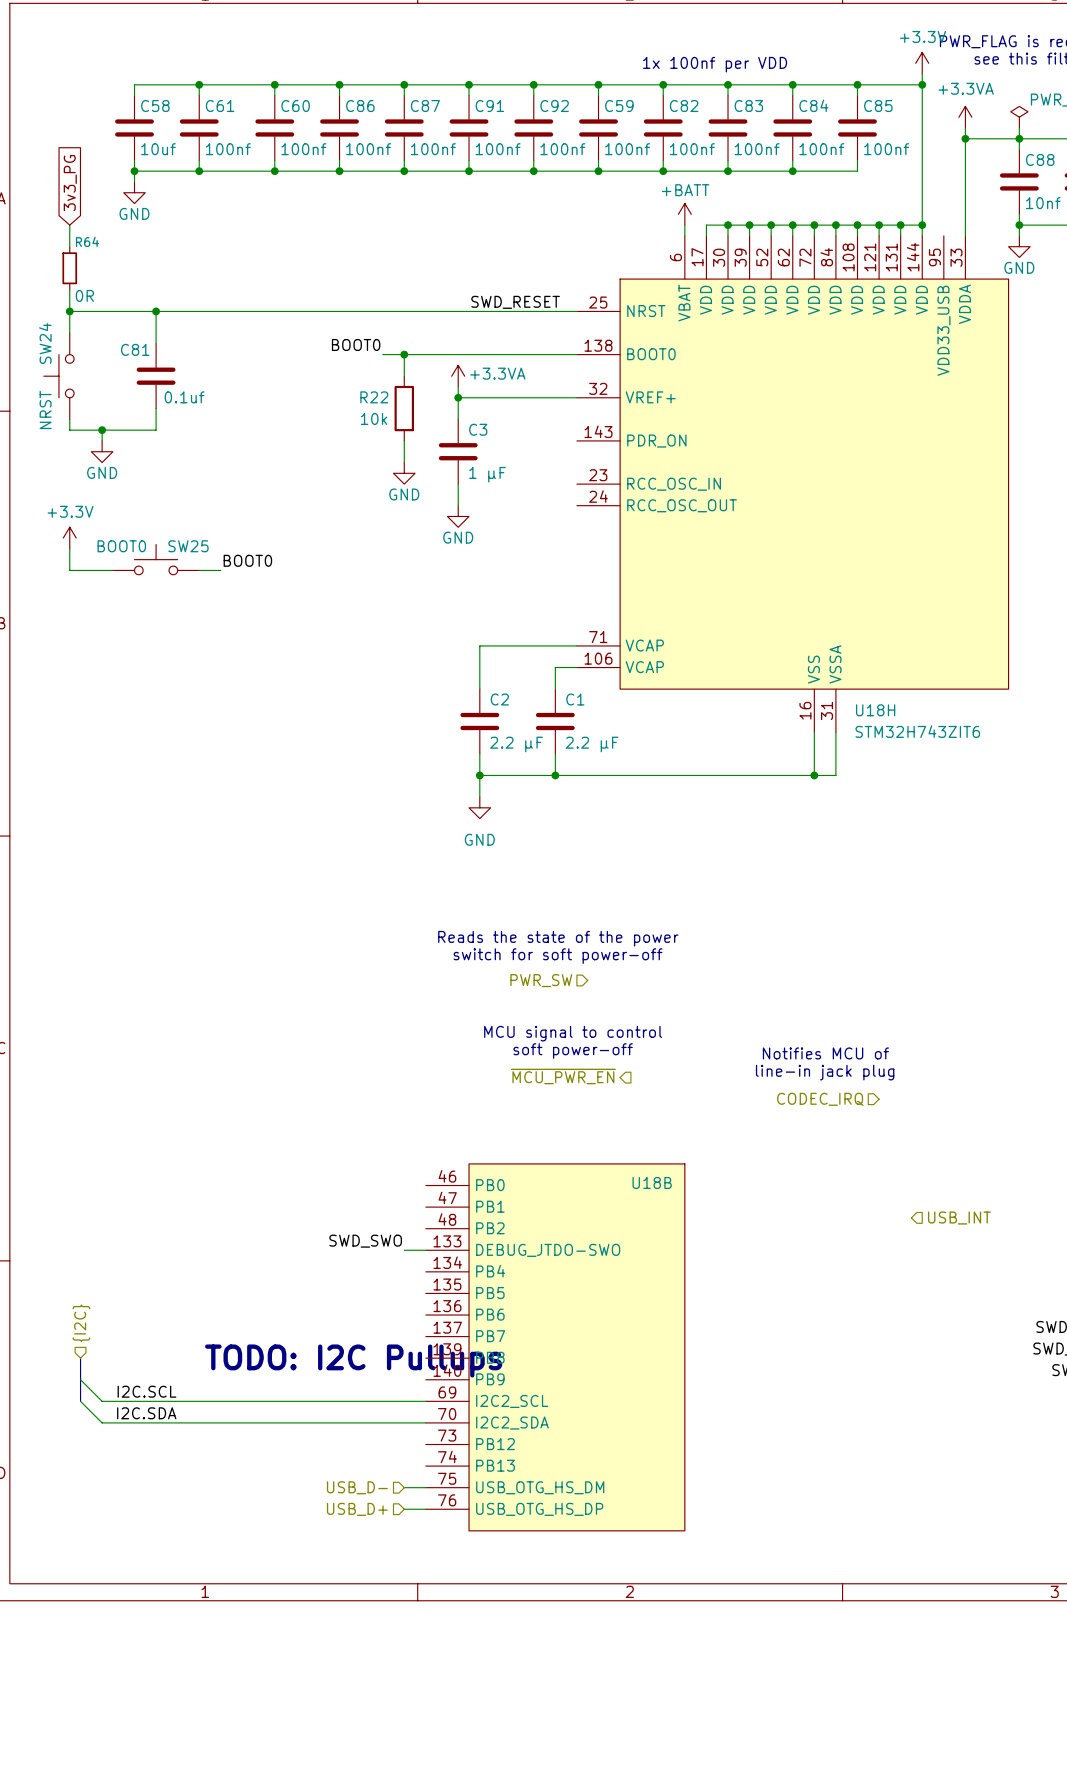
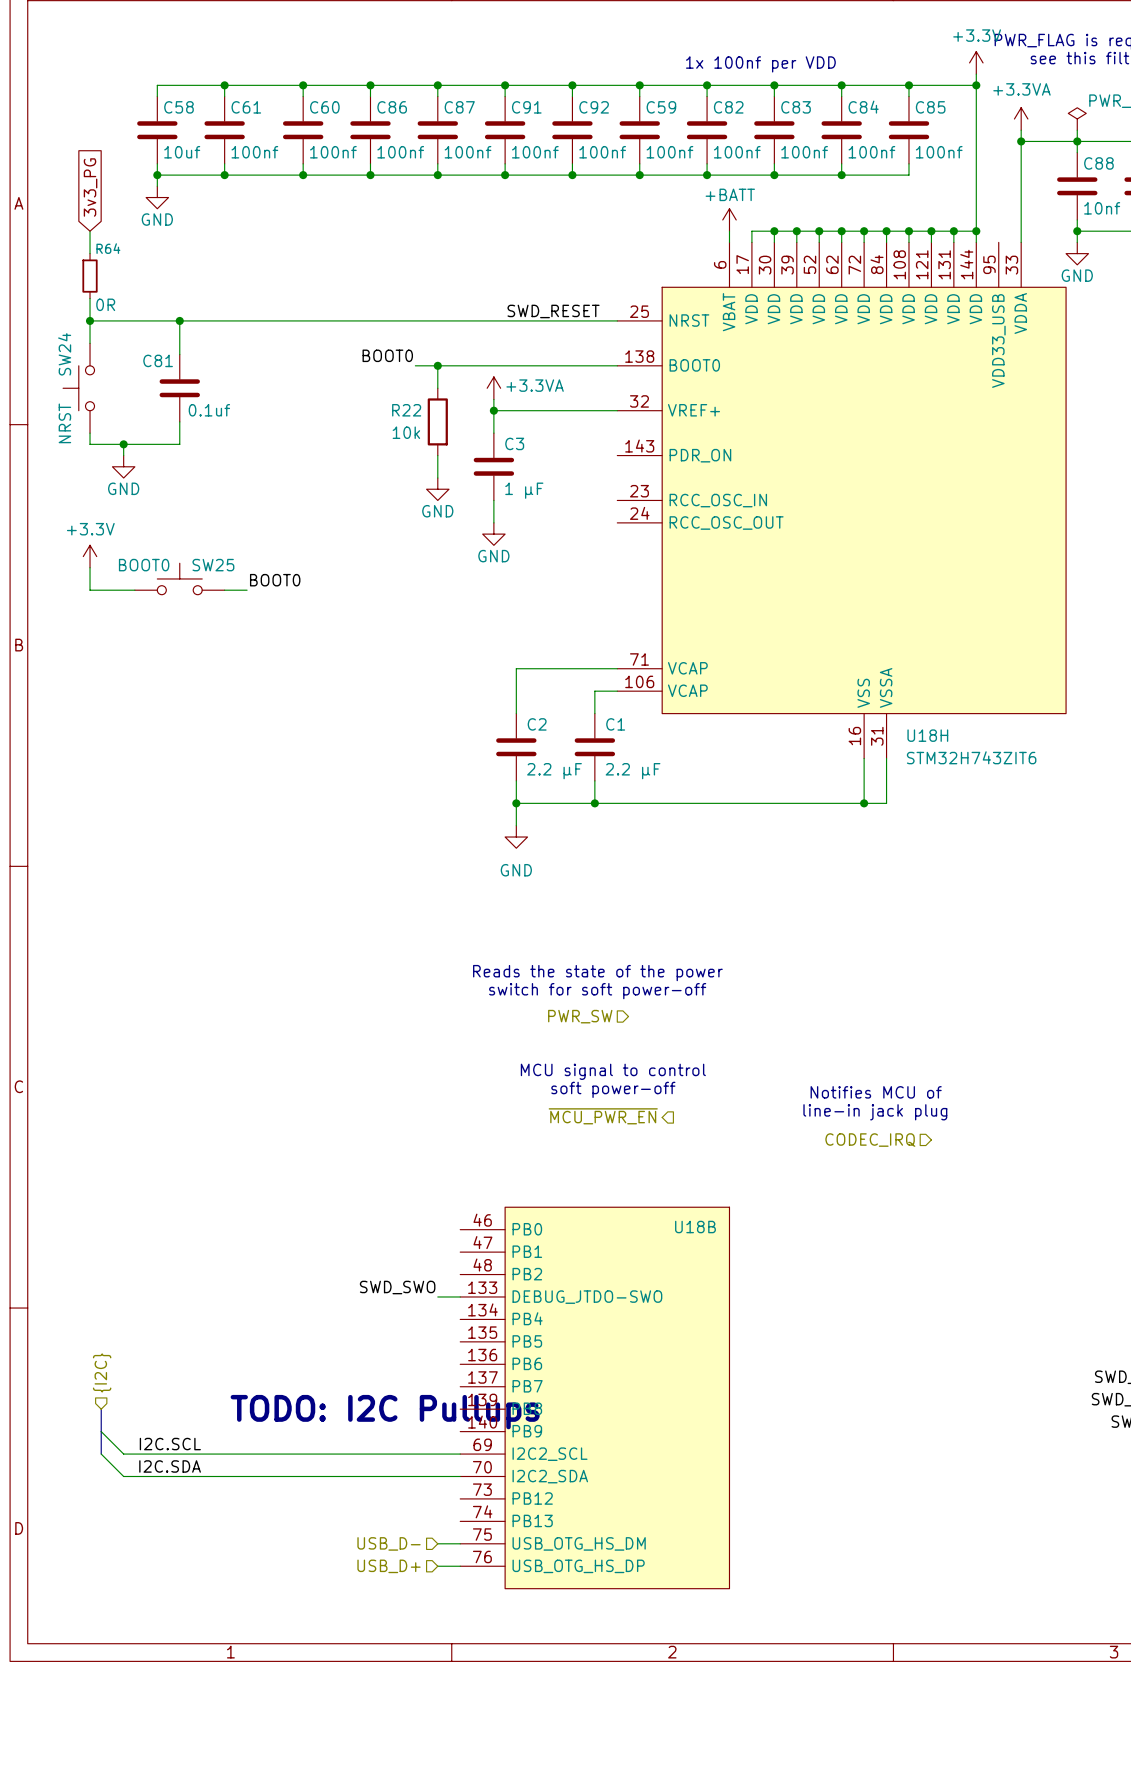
hierarchical label: USB_INT (959, 1218) -> none

